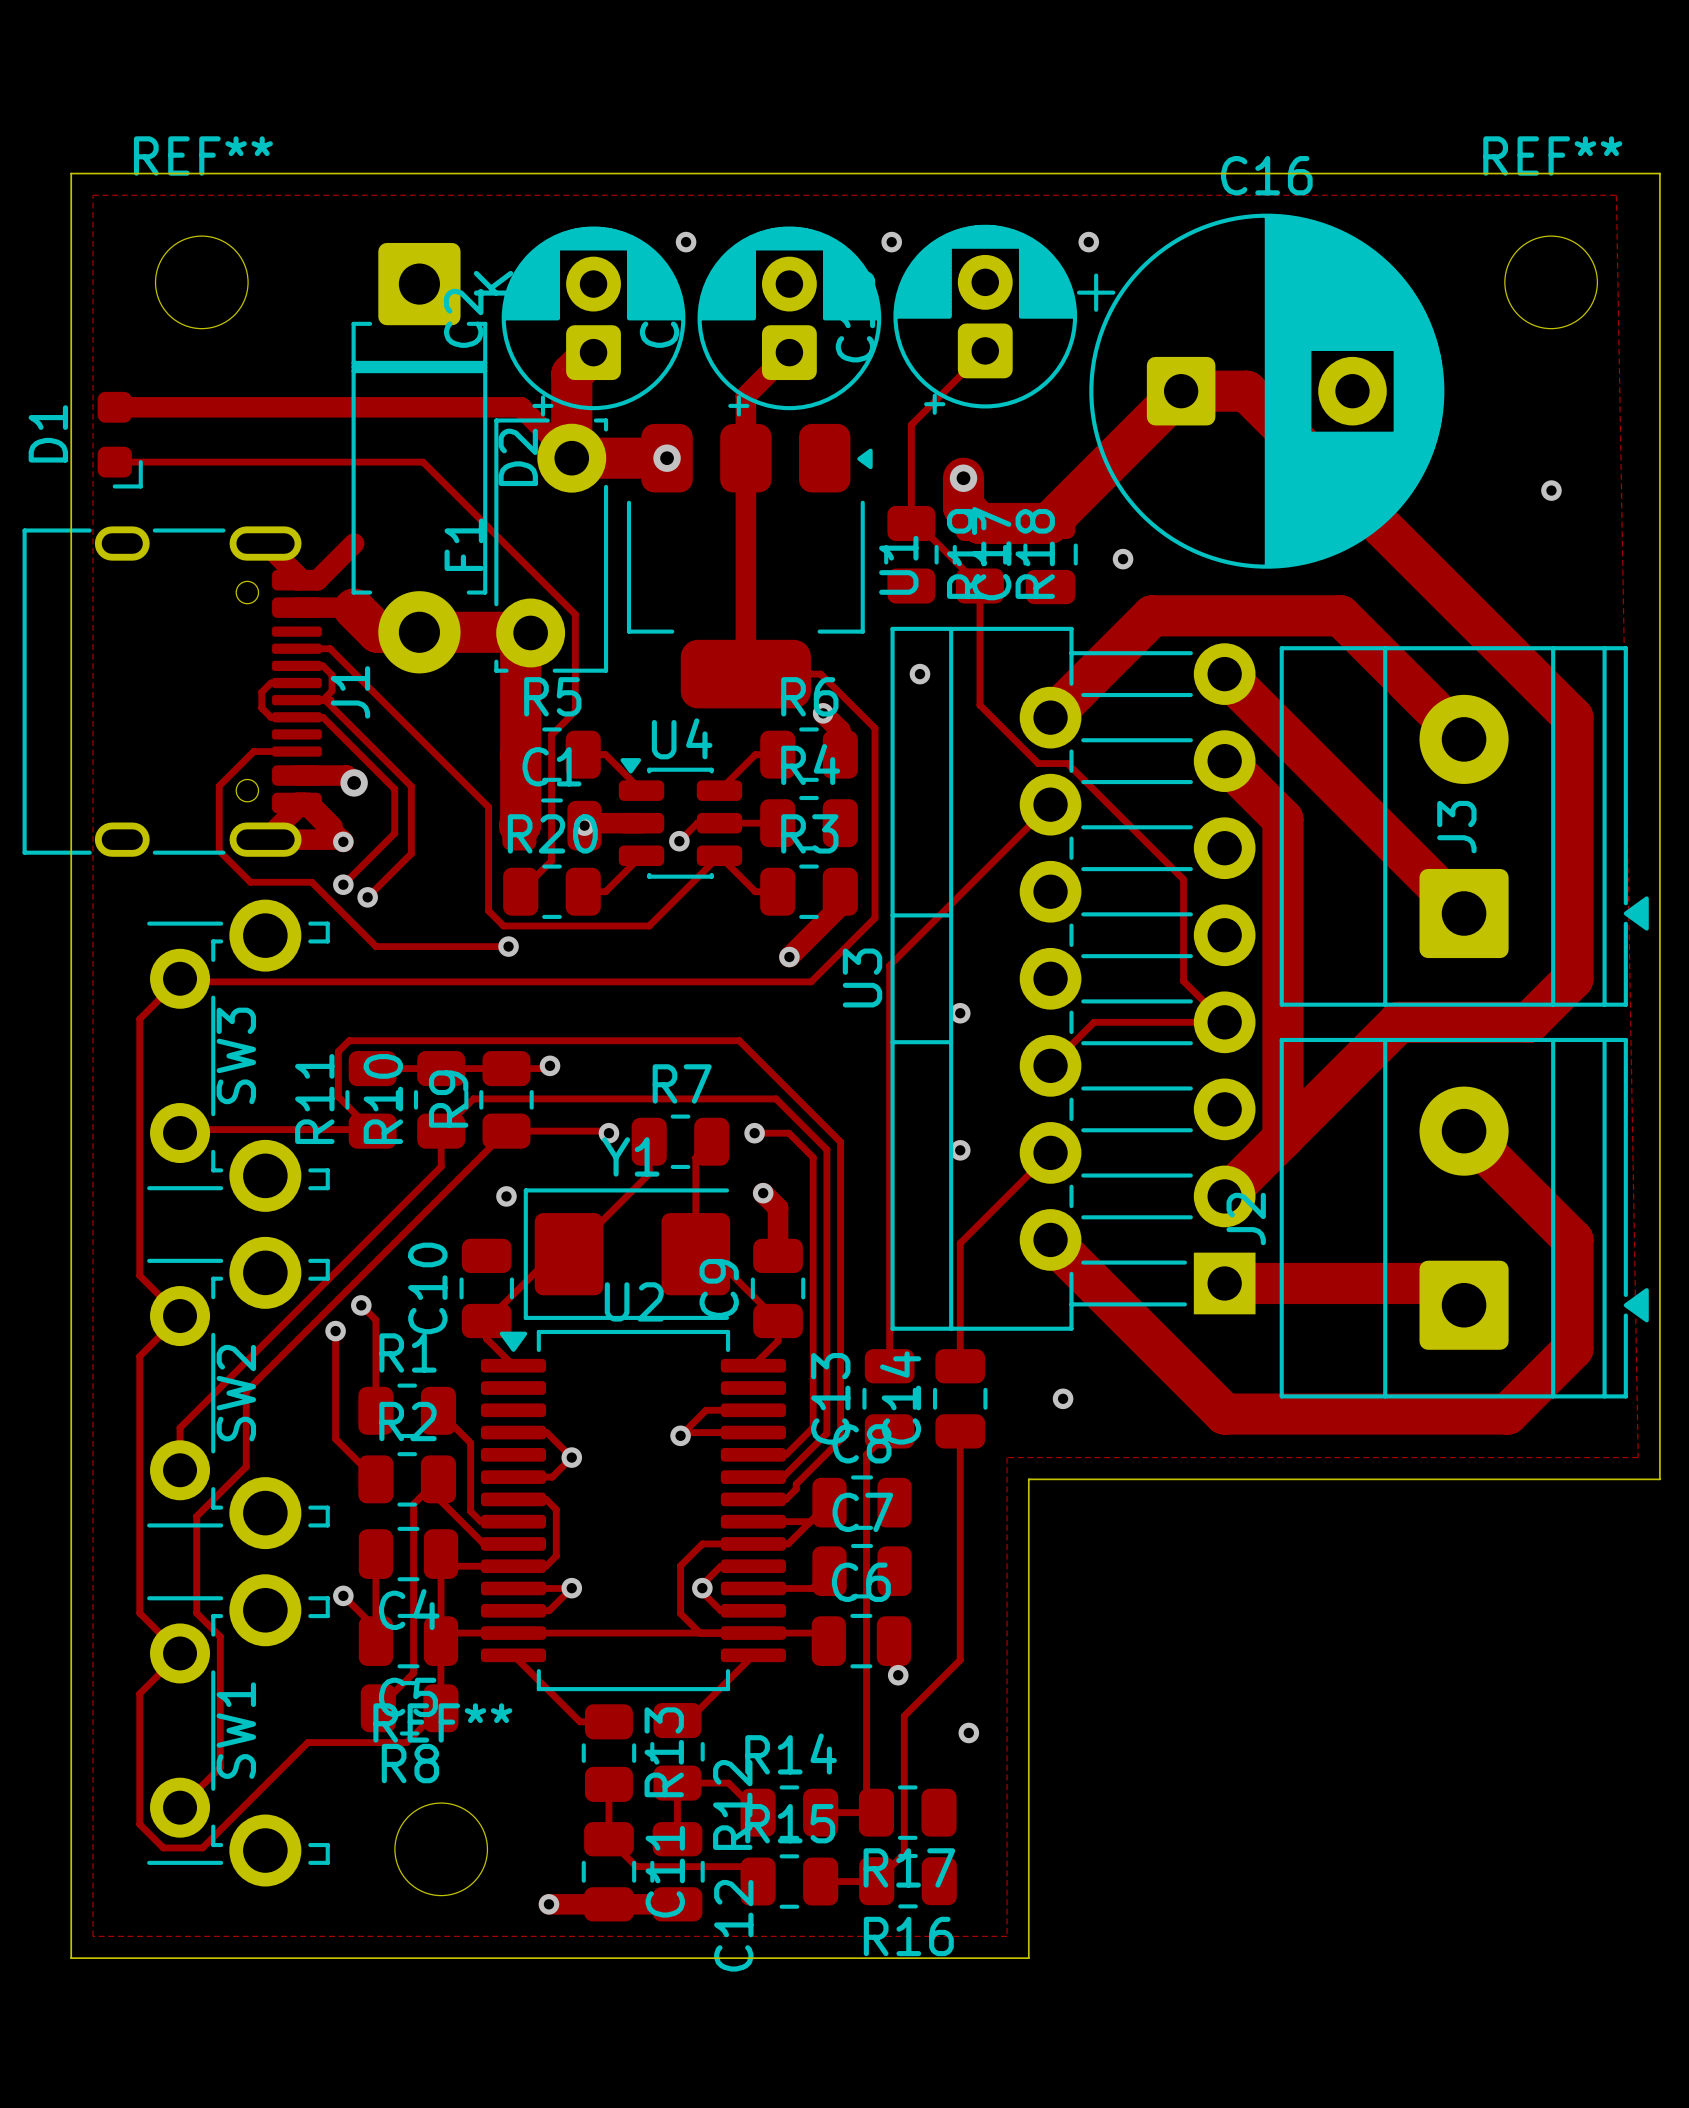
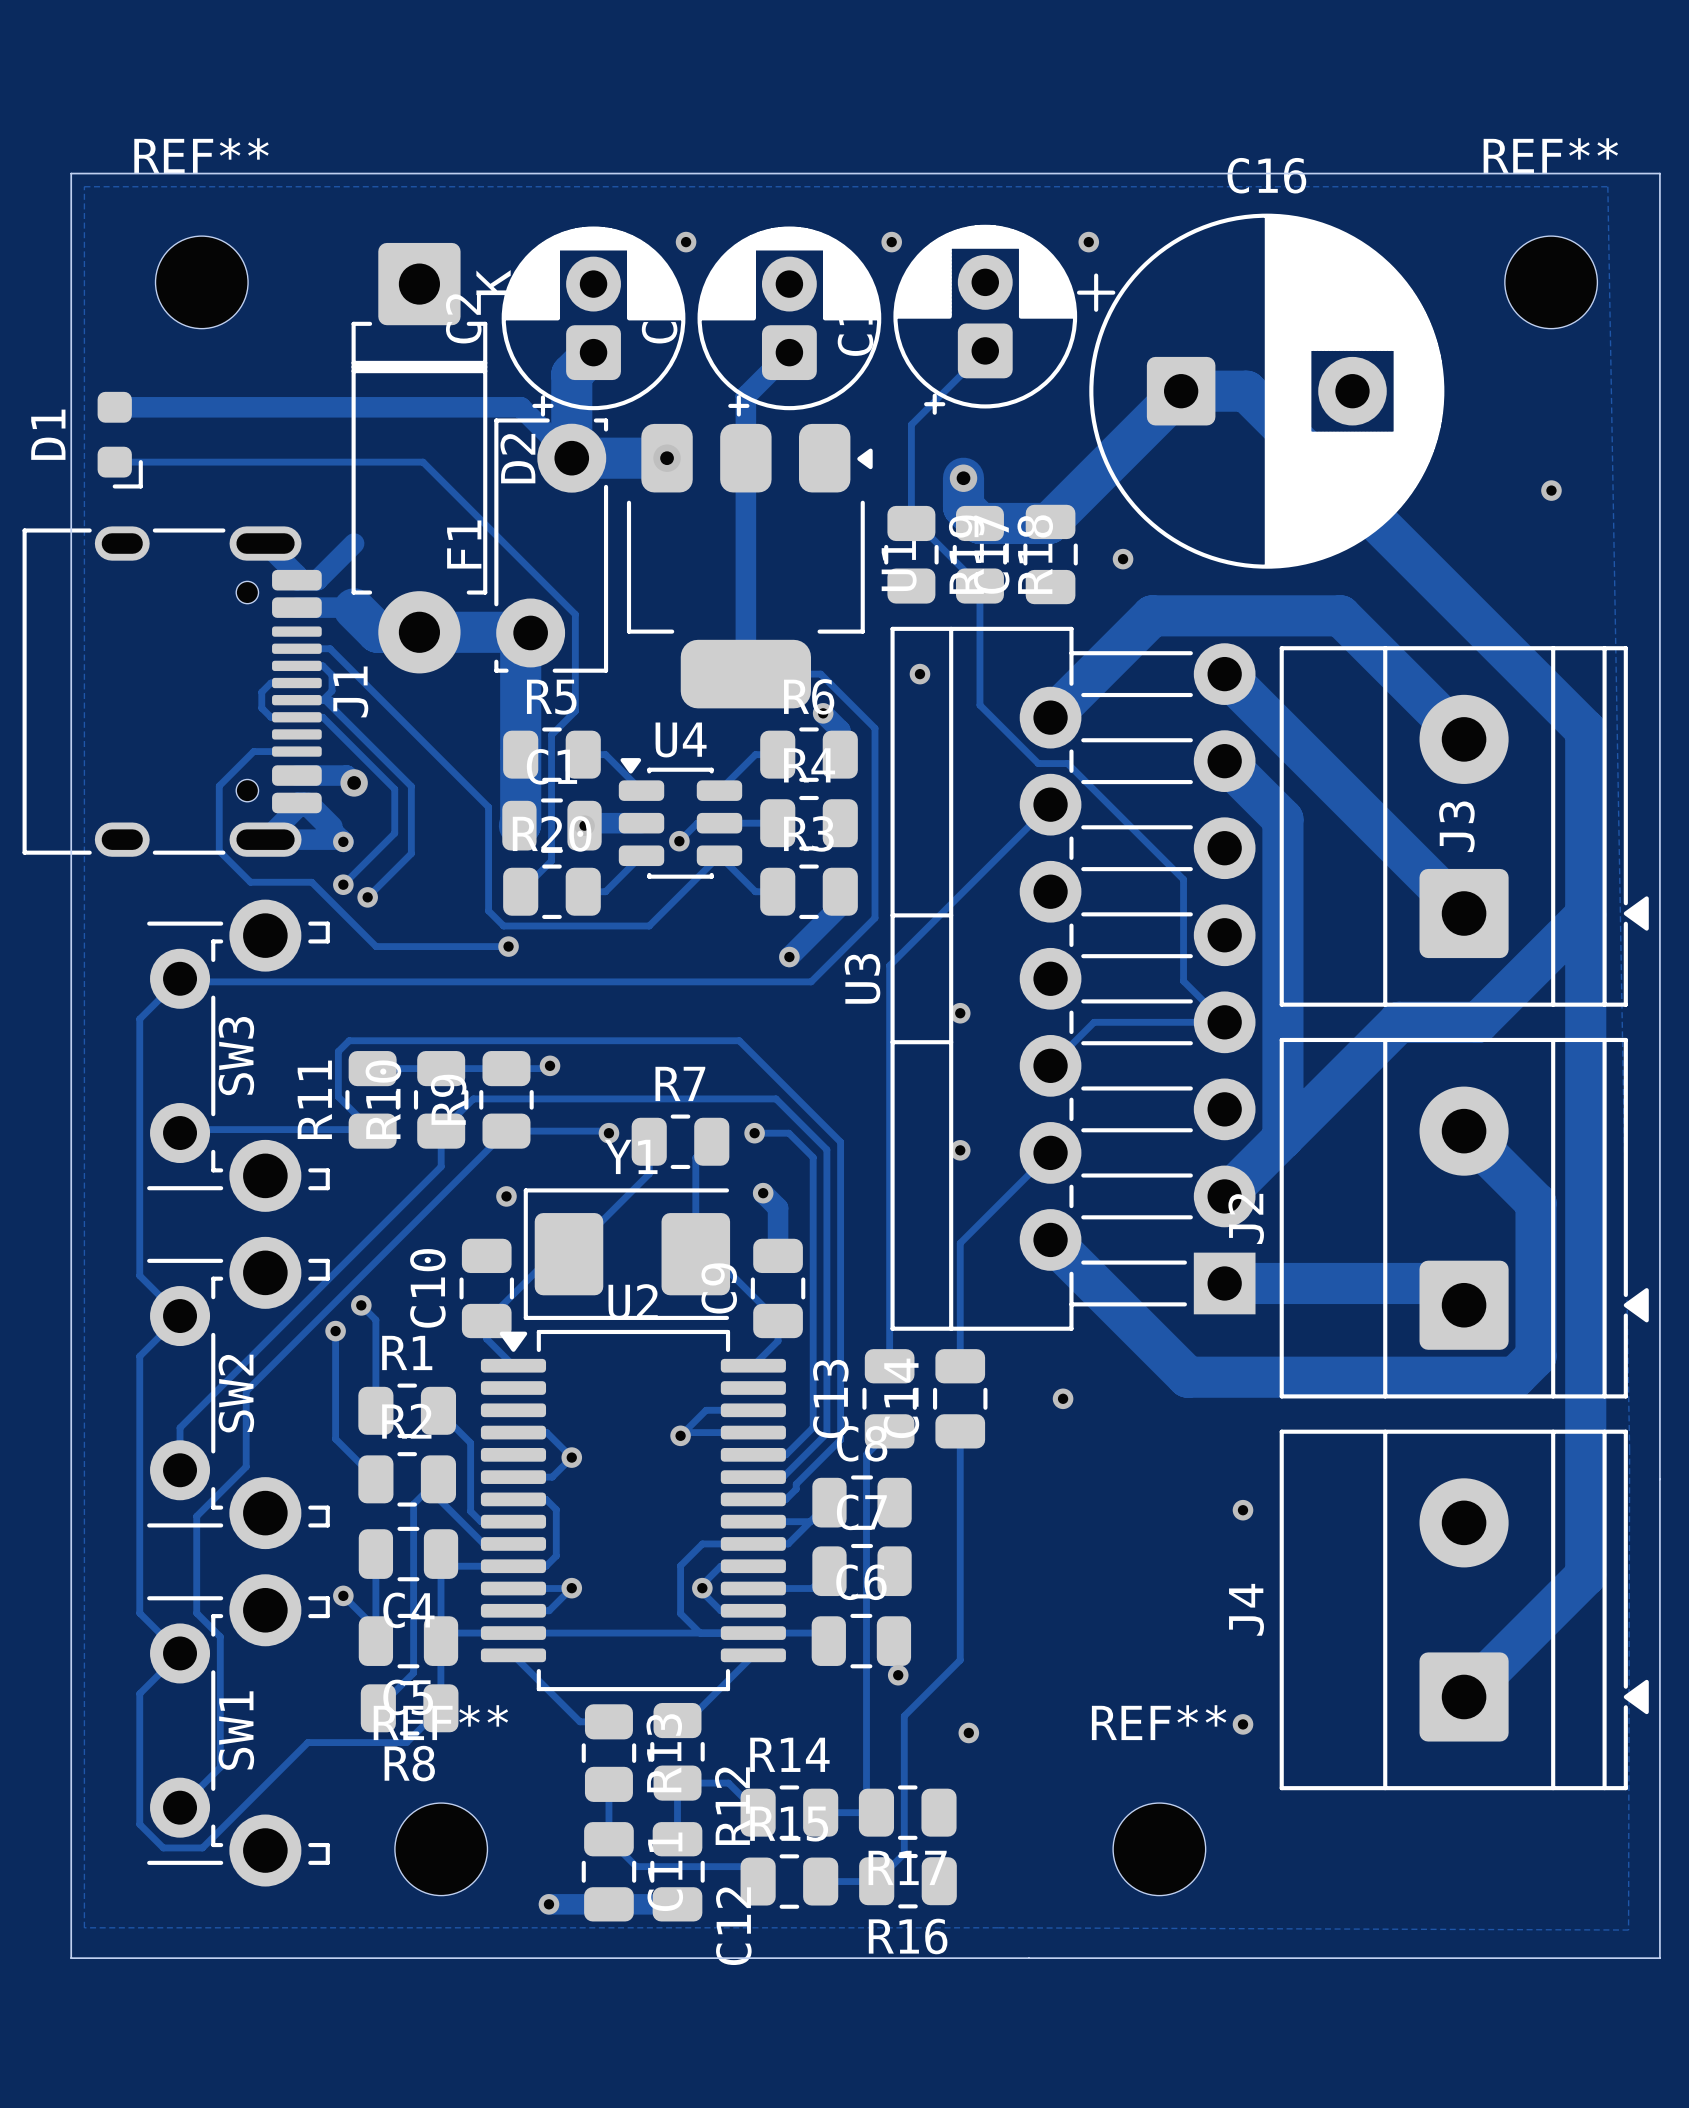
zone outline: (92, 195) (1616, 195) (1638, 1457) (1007, 1457) (1007, 1936) (92, 1936) (92, 195) -> (84, 186) (84, 1927) (1628, 1930) (1629, 1449) (1607, 186) (84, 186)
track: (1572, 717) (1572, 978) (1529, 1022) (1478, 1022) -> (1585, 914) (1478, 1022)
track: none -> (1572, 717) (1585, 730) (1585, 1575) (1464, 1696)
track: (1536, 1203) (1572, 1239) (1572, 1348) (1507, 1414) (1224, 1414) (1187, 1377) -> (1536, 1203) (1536, 1356) (1515, 1377) (1187, 1377)
board edge: (1659, 1479) (1028, 1479) (1028, 1958) -> (1659, 1479) (1659, 1958) (1028, 1958)
via: none -> (1243, 1510)
J4: none -> (1464, 1609)
via: none -> (1243, 1724)
REF**: none -> (1159, 1849)

